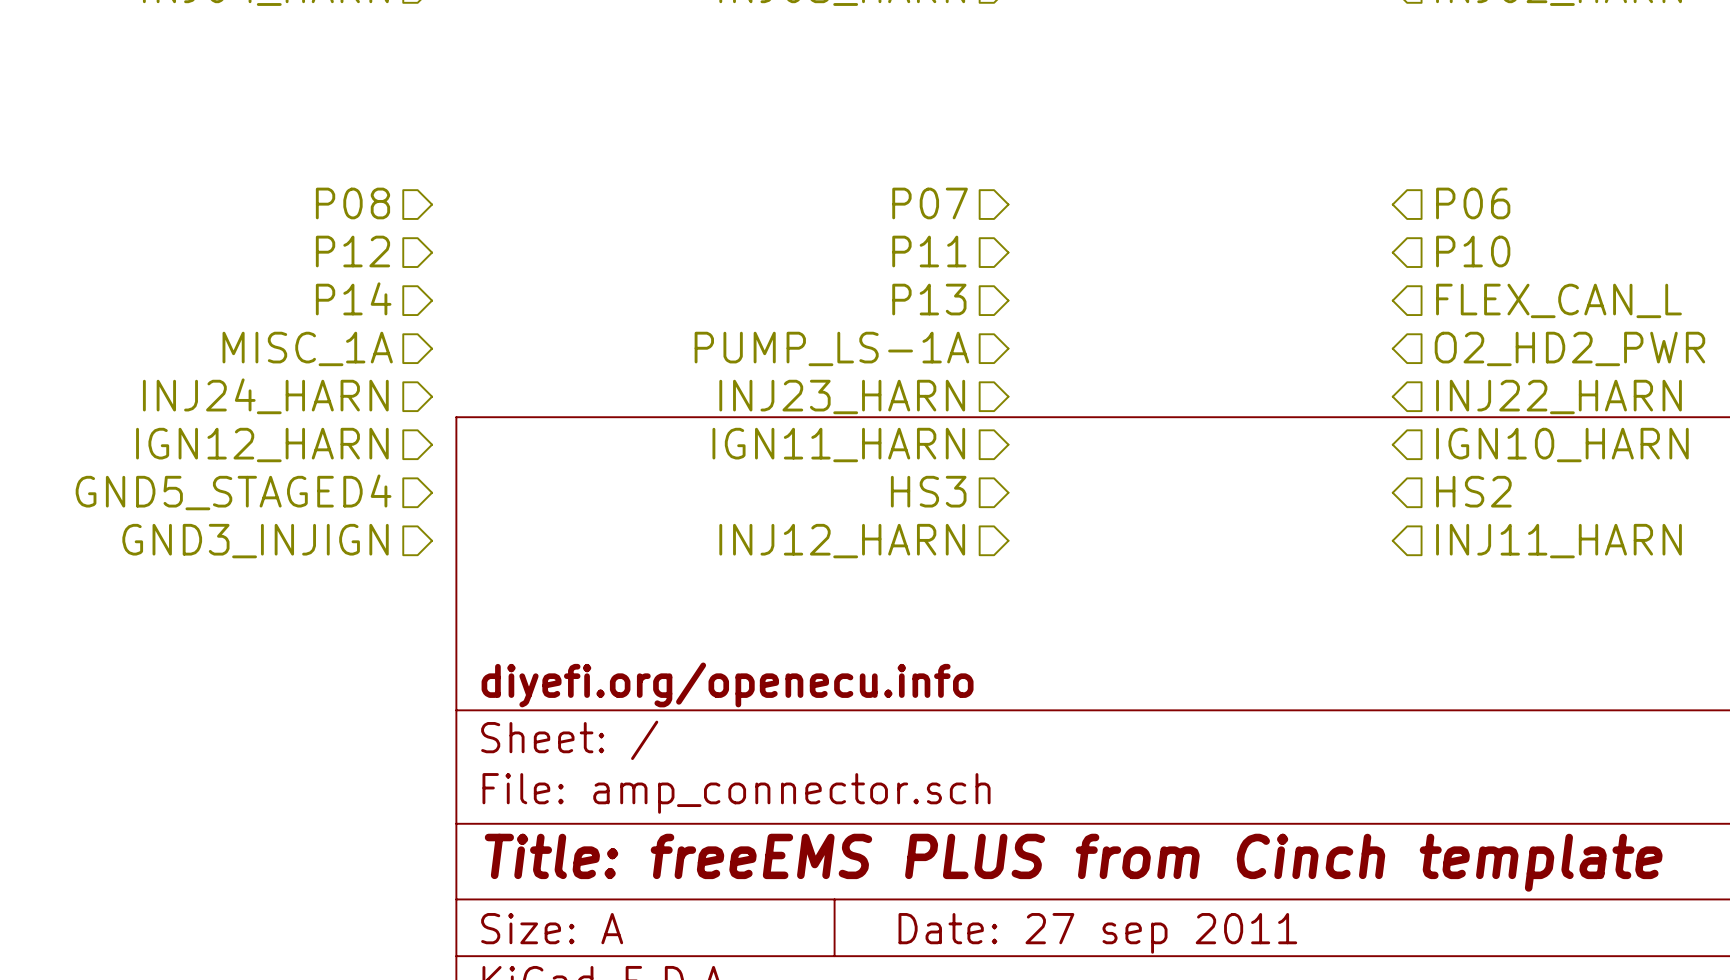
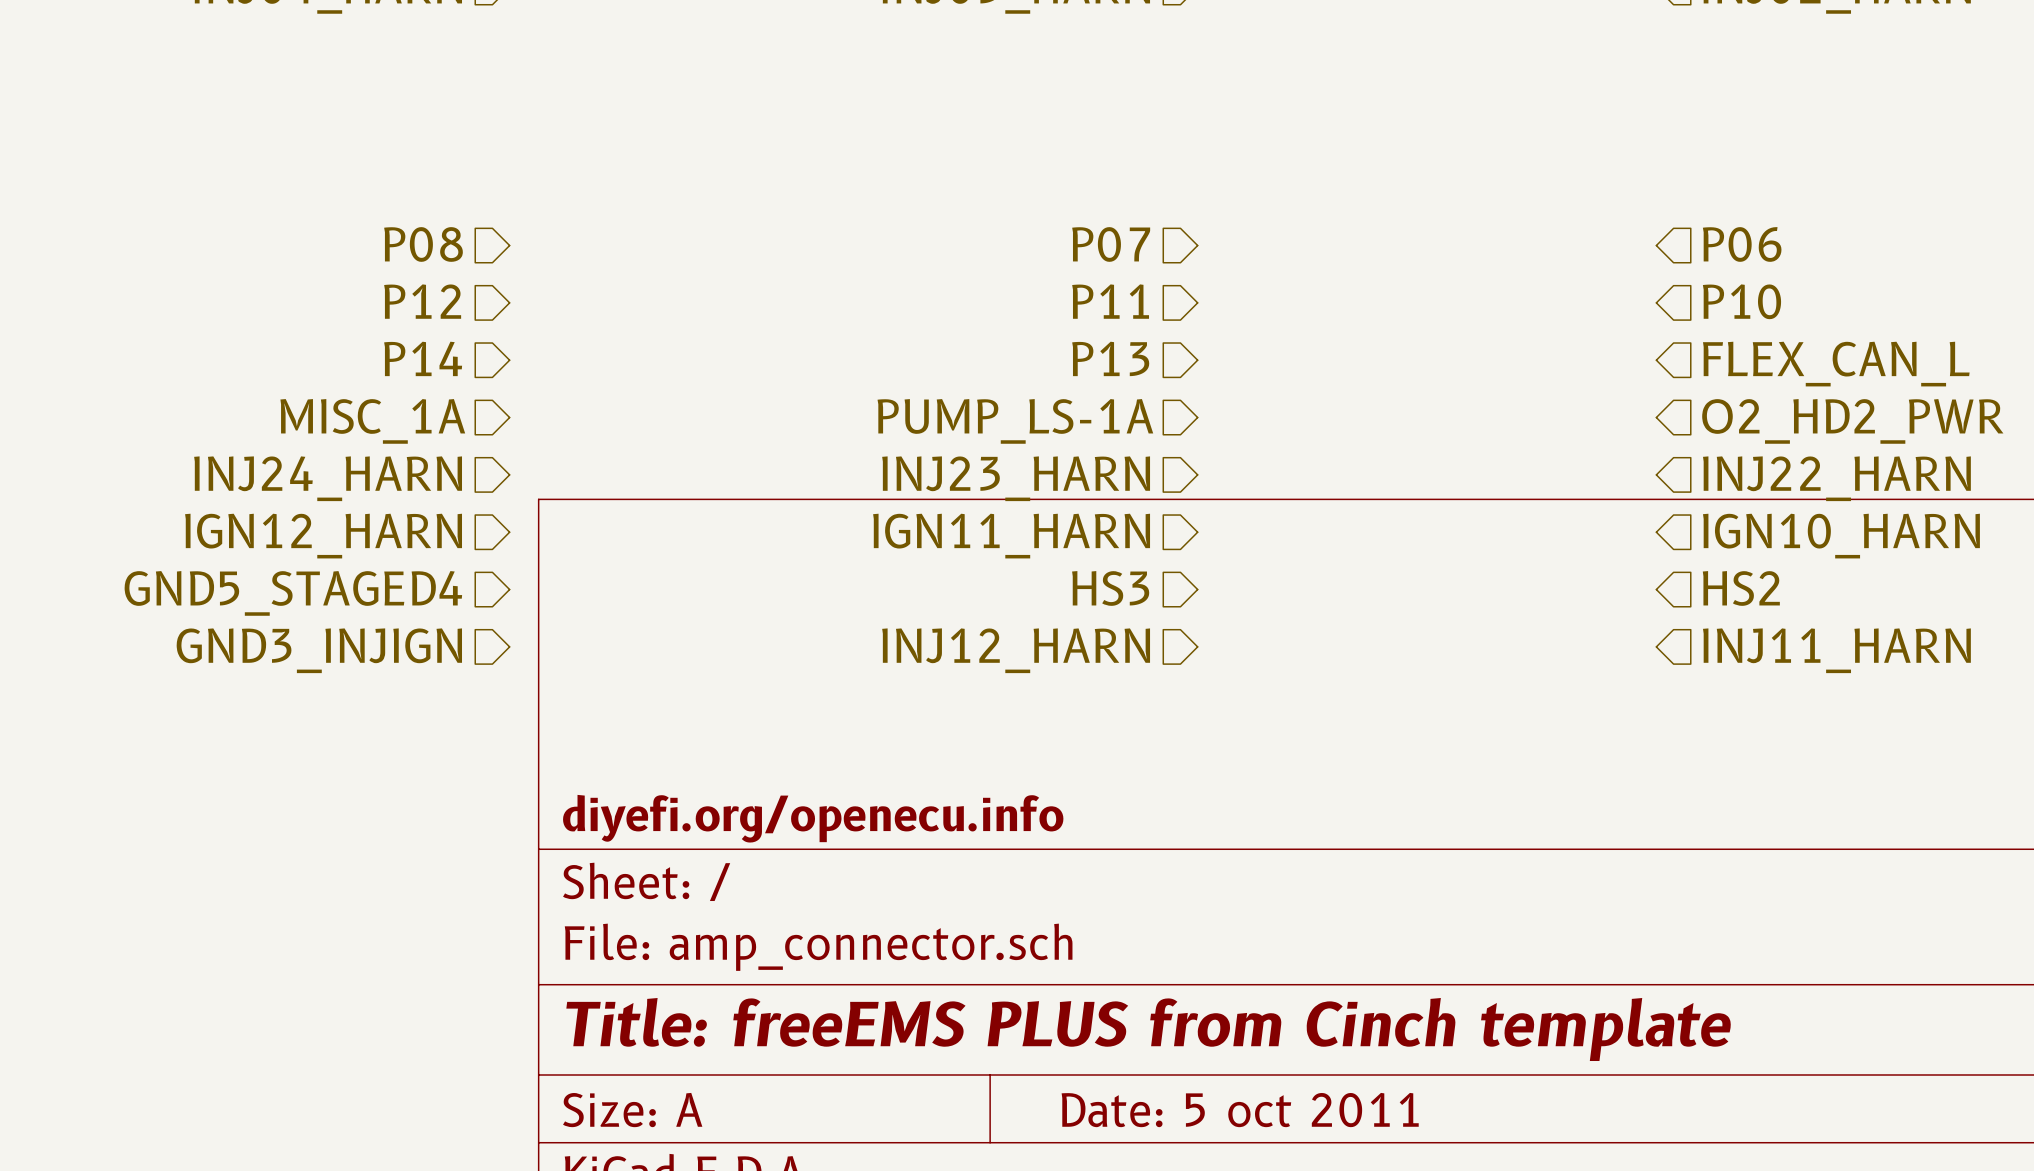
title block: Date: 27 sep 2011 (1097, 933) -> Date: 5 oct 2011 (1240, 1110)

